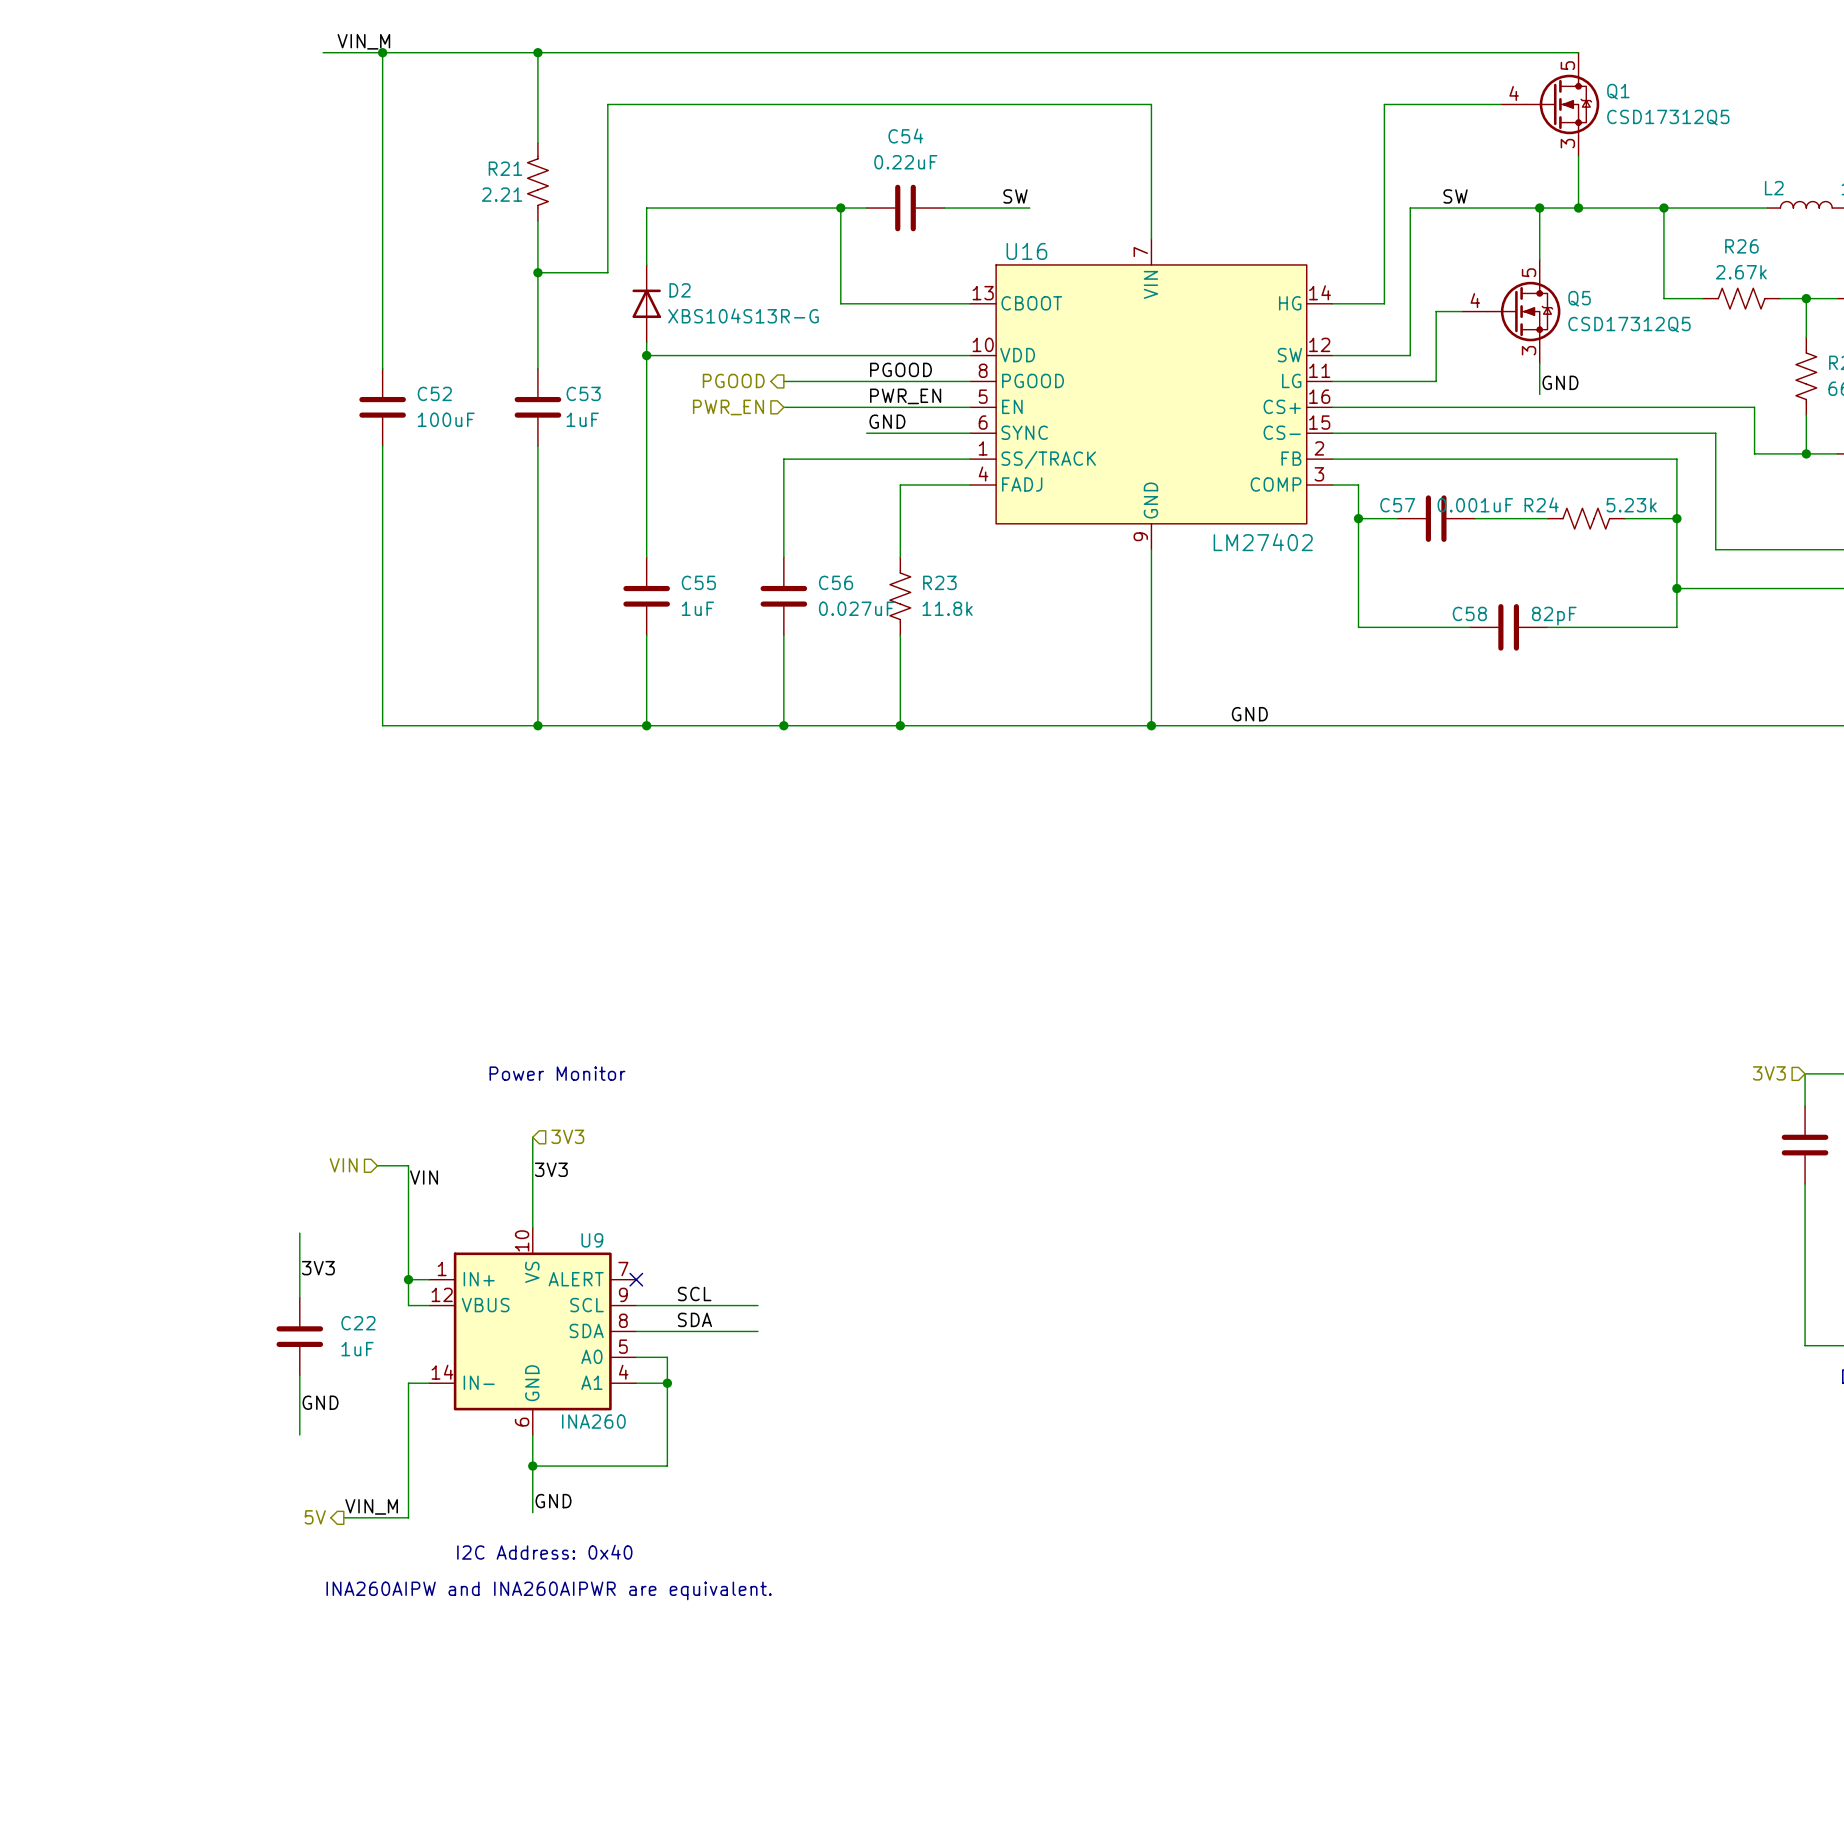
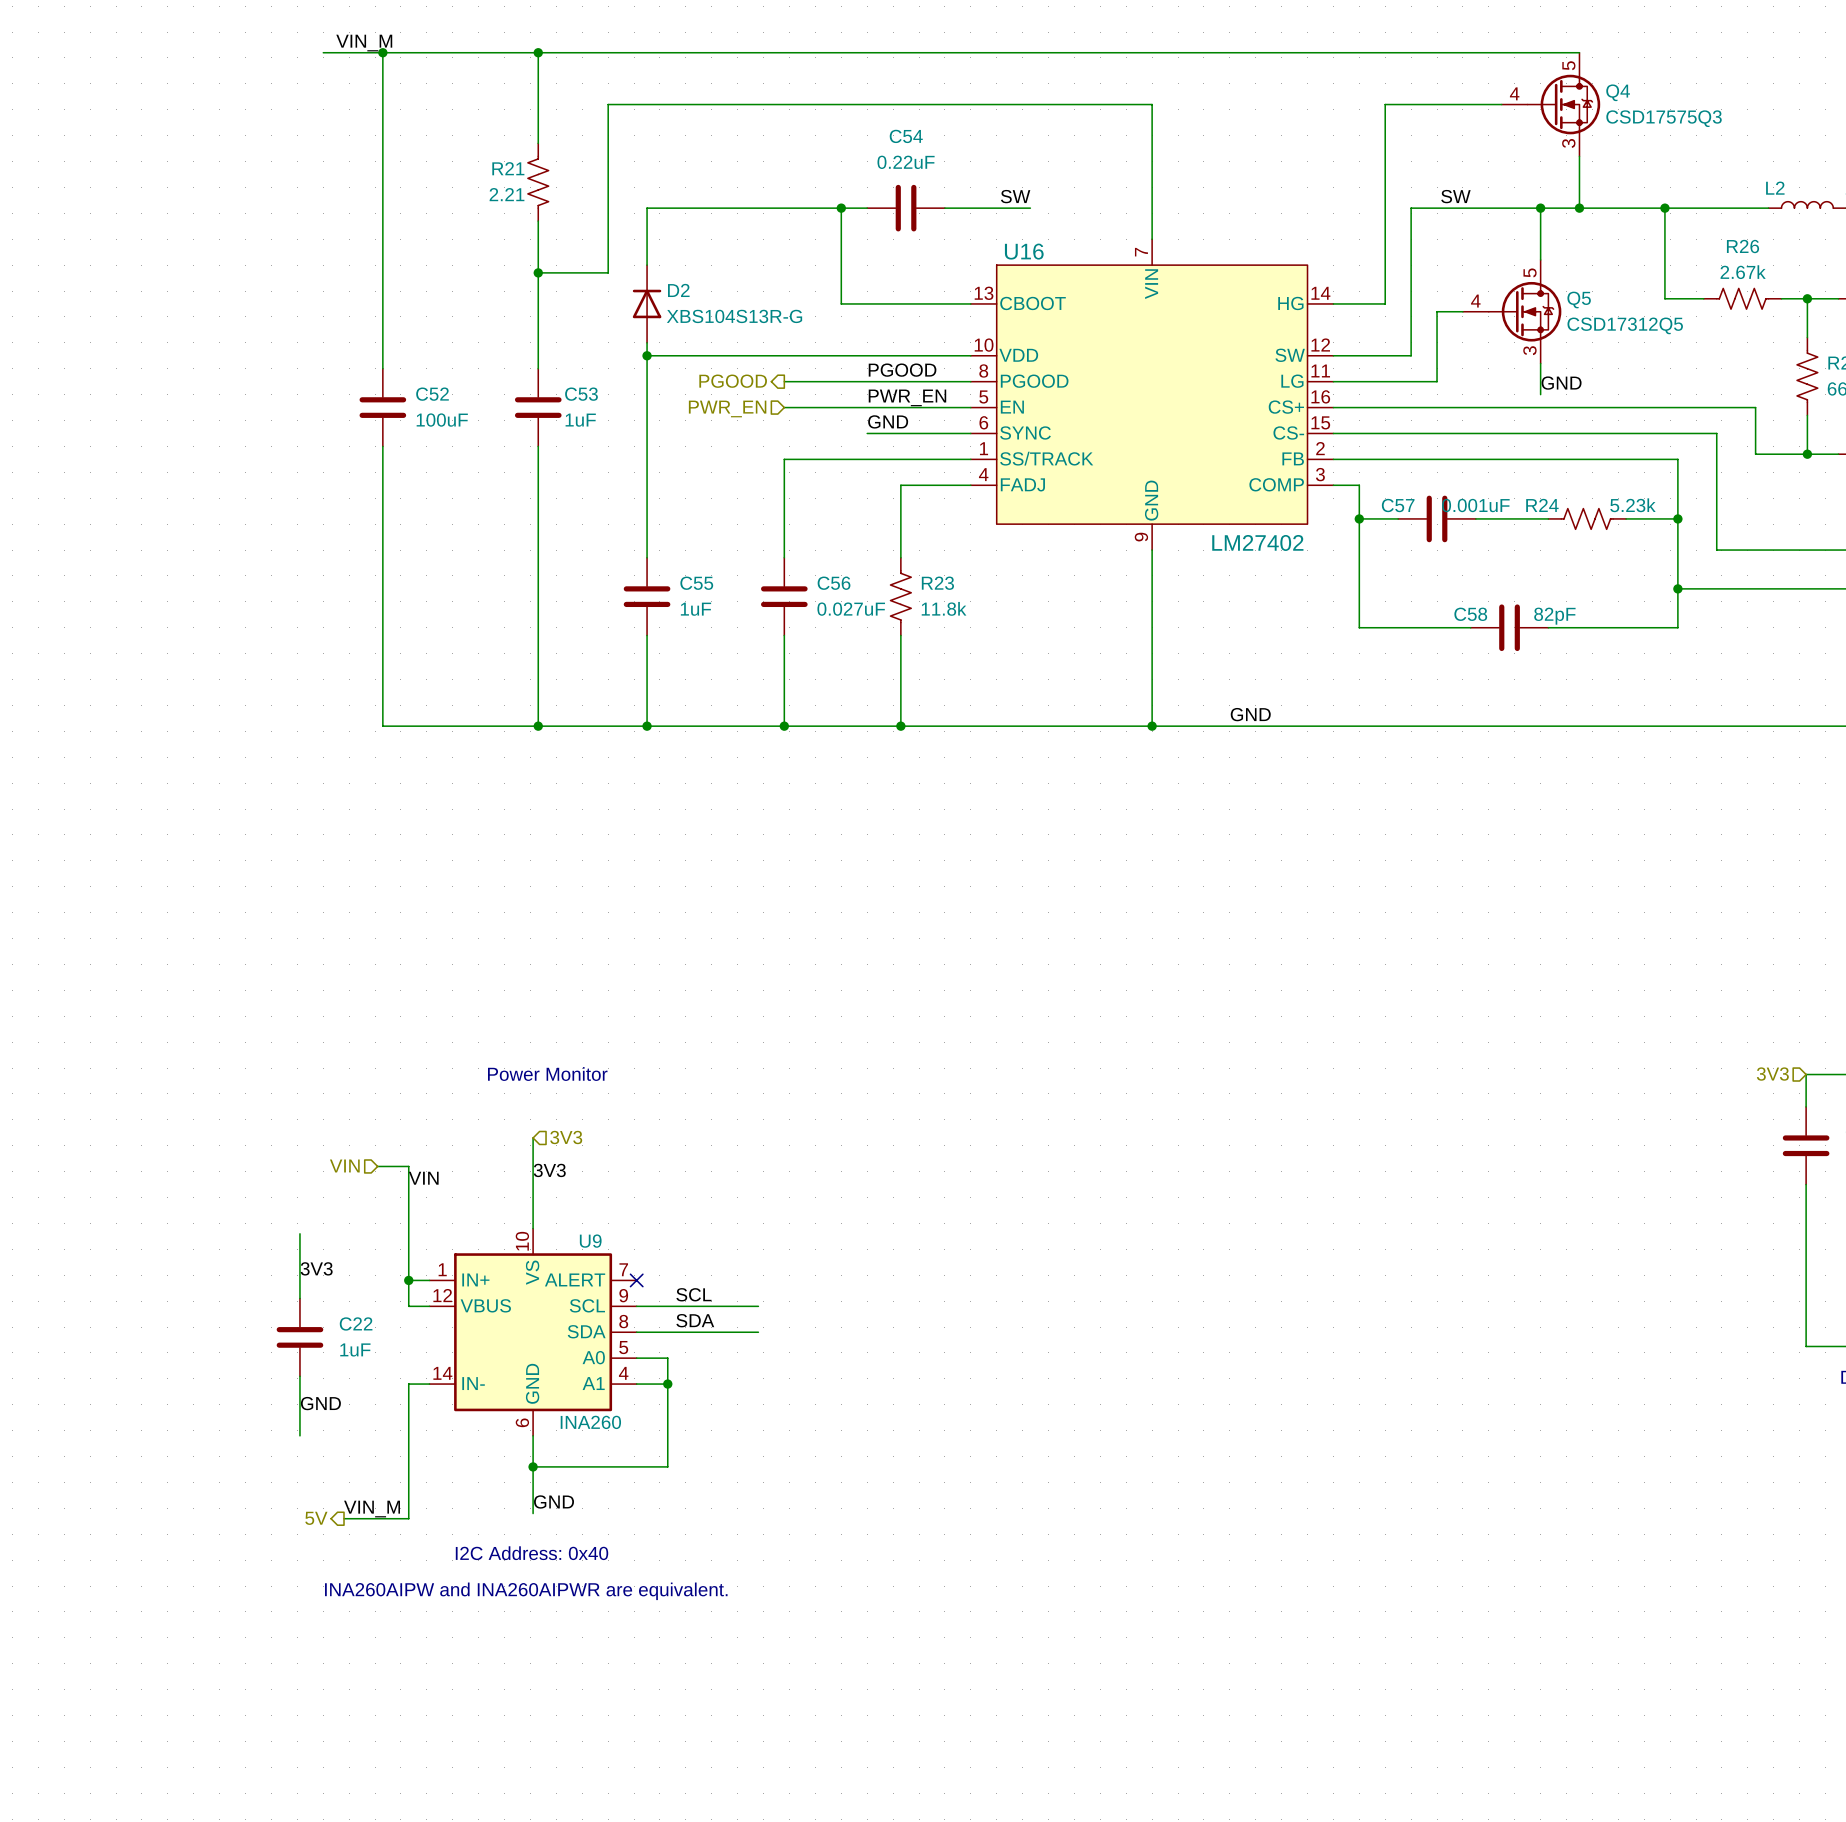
Q1 name: Q1 (1618, 91) -> Q4 (1618, 92)
Q1 value: CSD17312Q5 (1668, 117) -> CSD17575Q3 (1664, 118)

